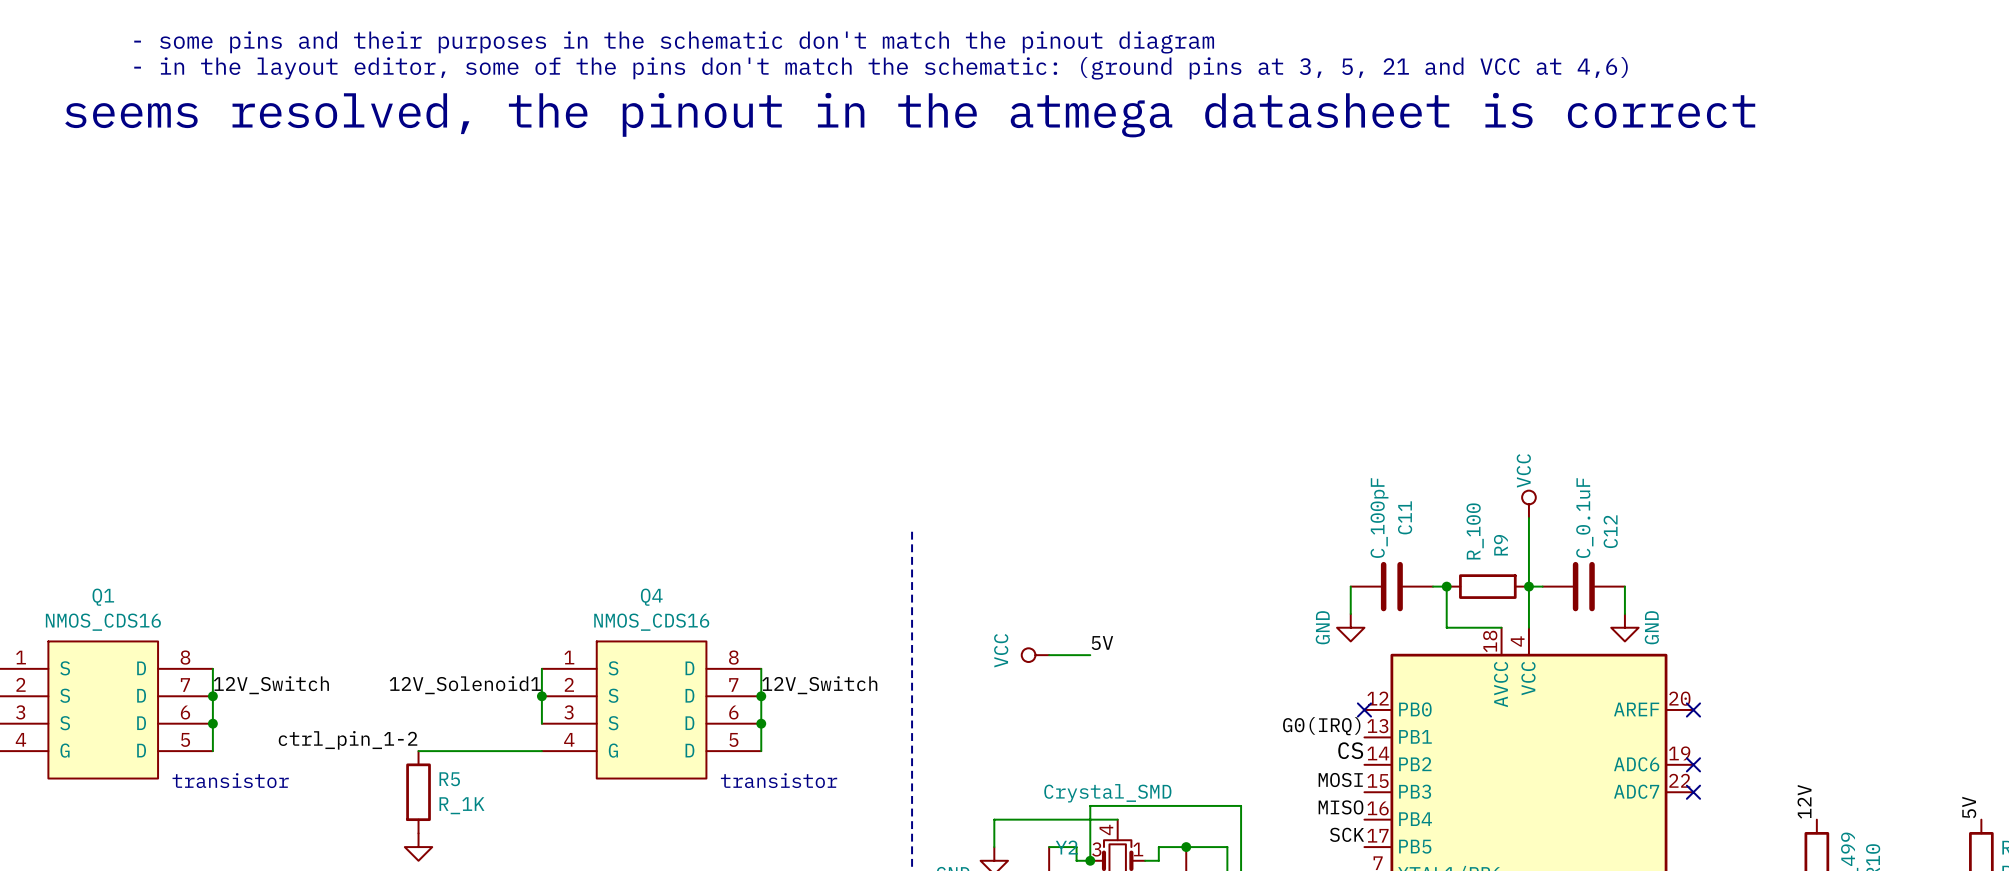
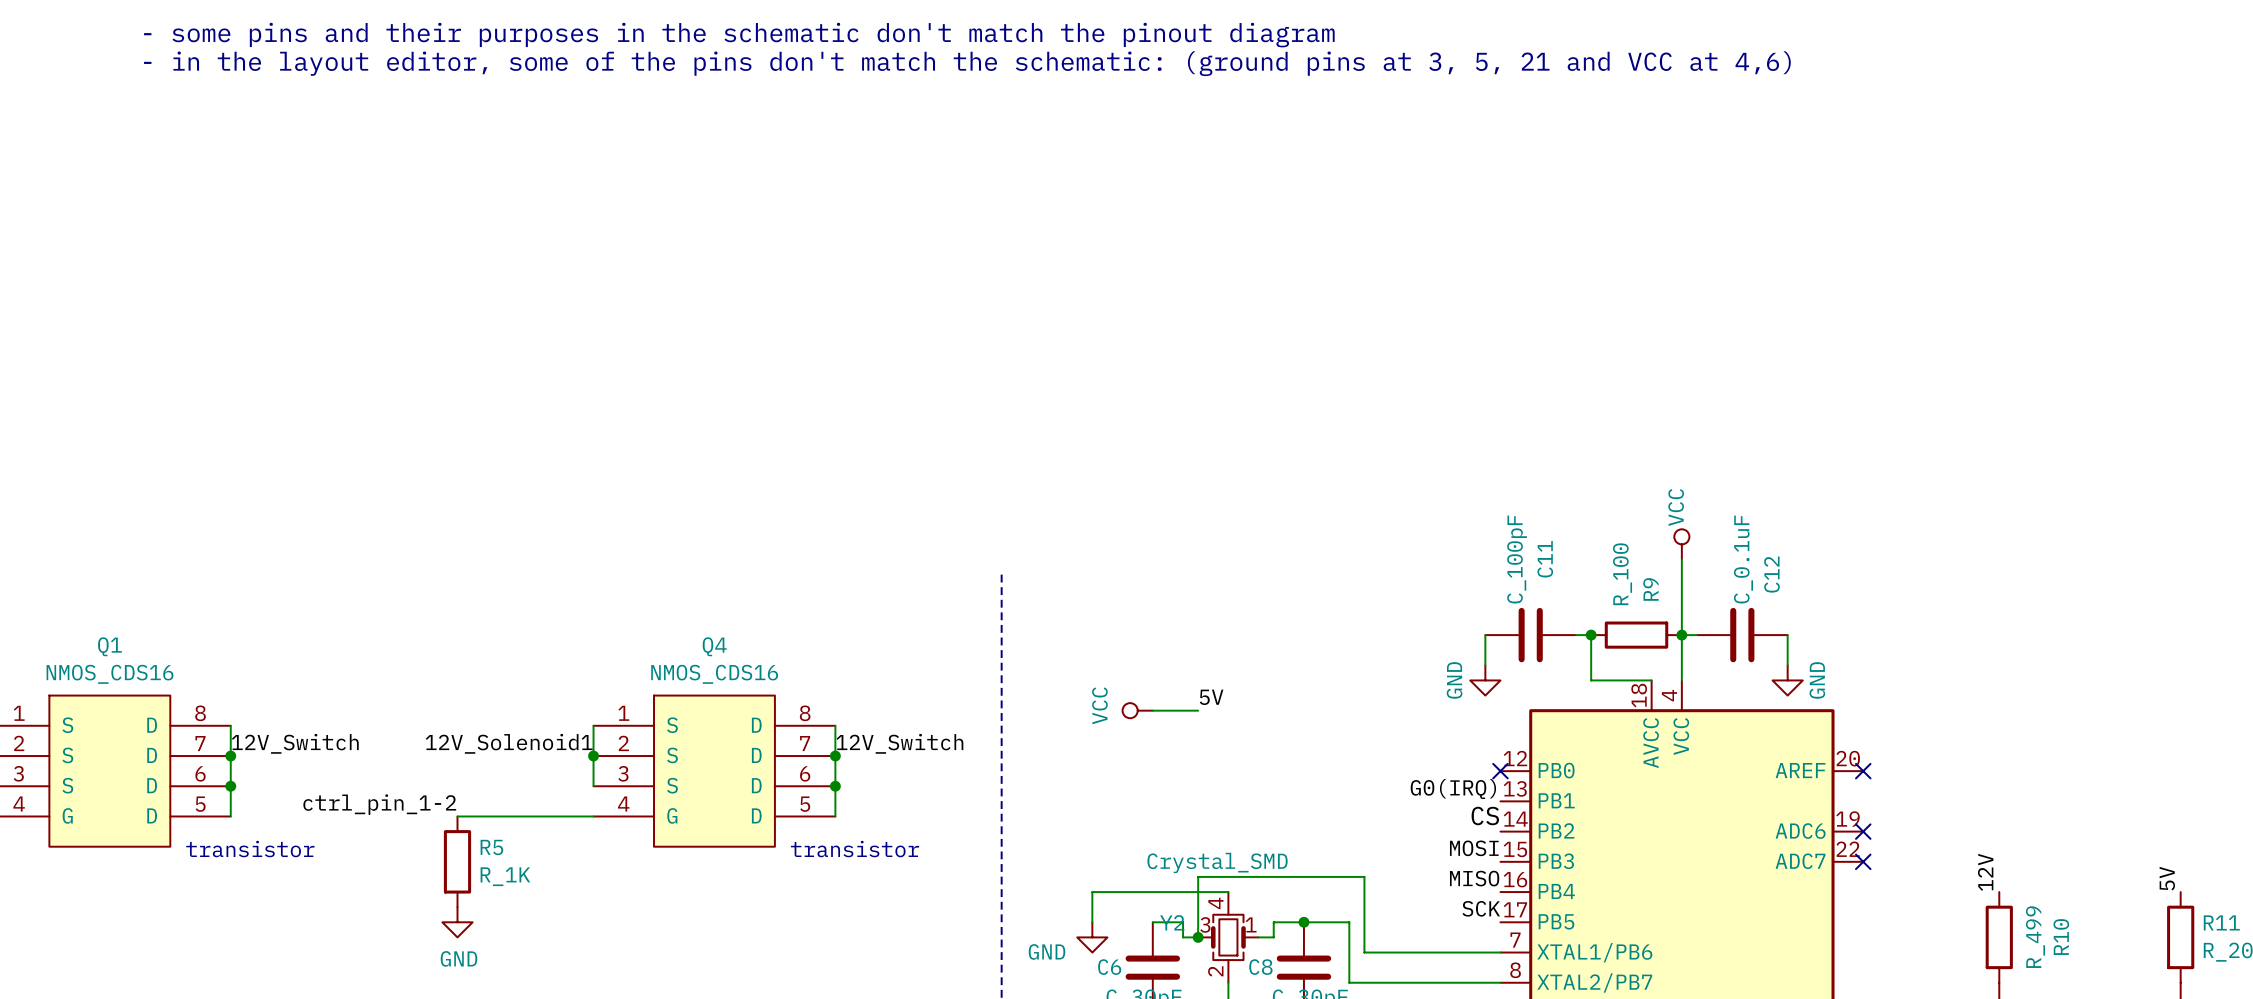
text: seems resolved, the pinout in the atmega datasheet is correct (910, 115) -> none

